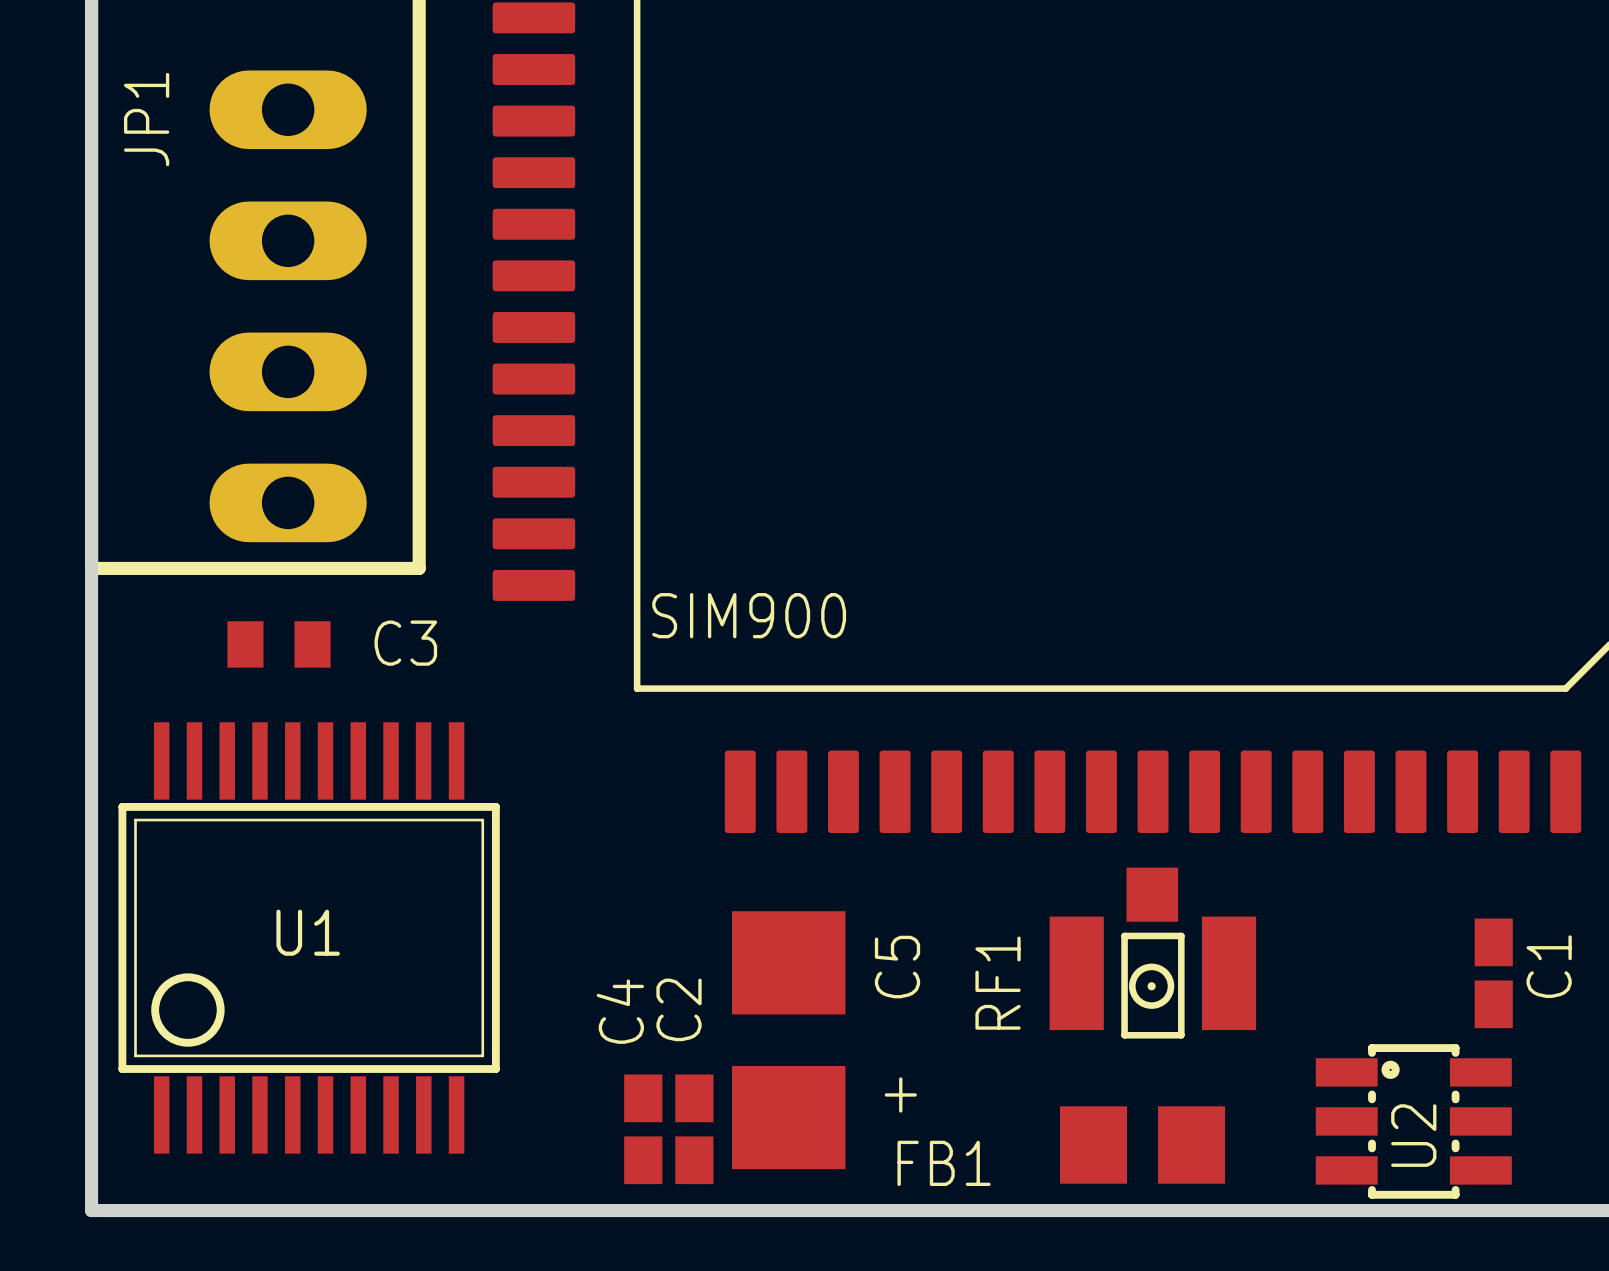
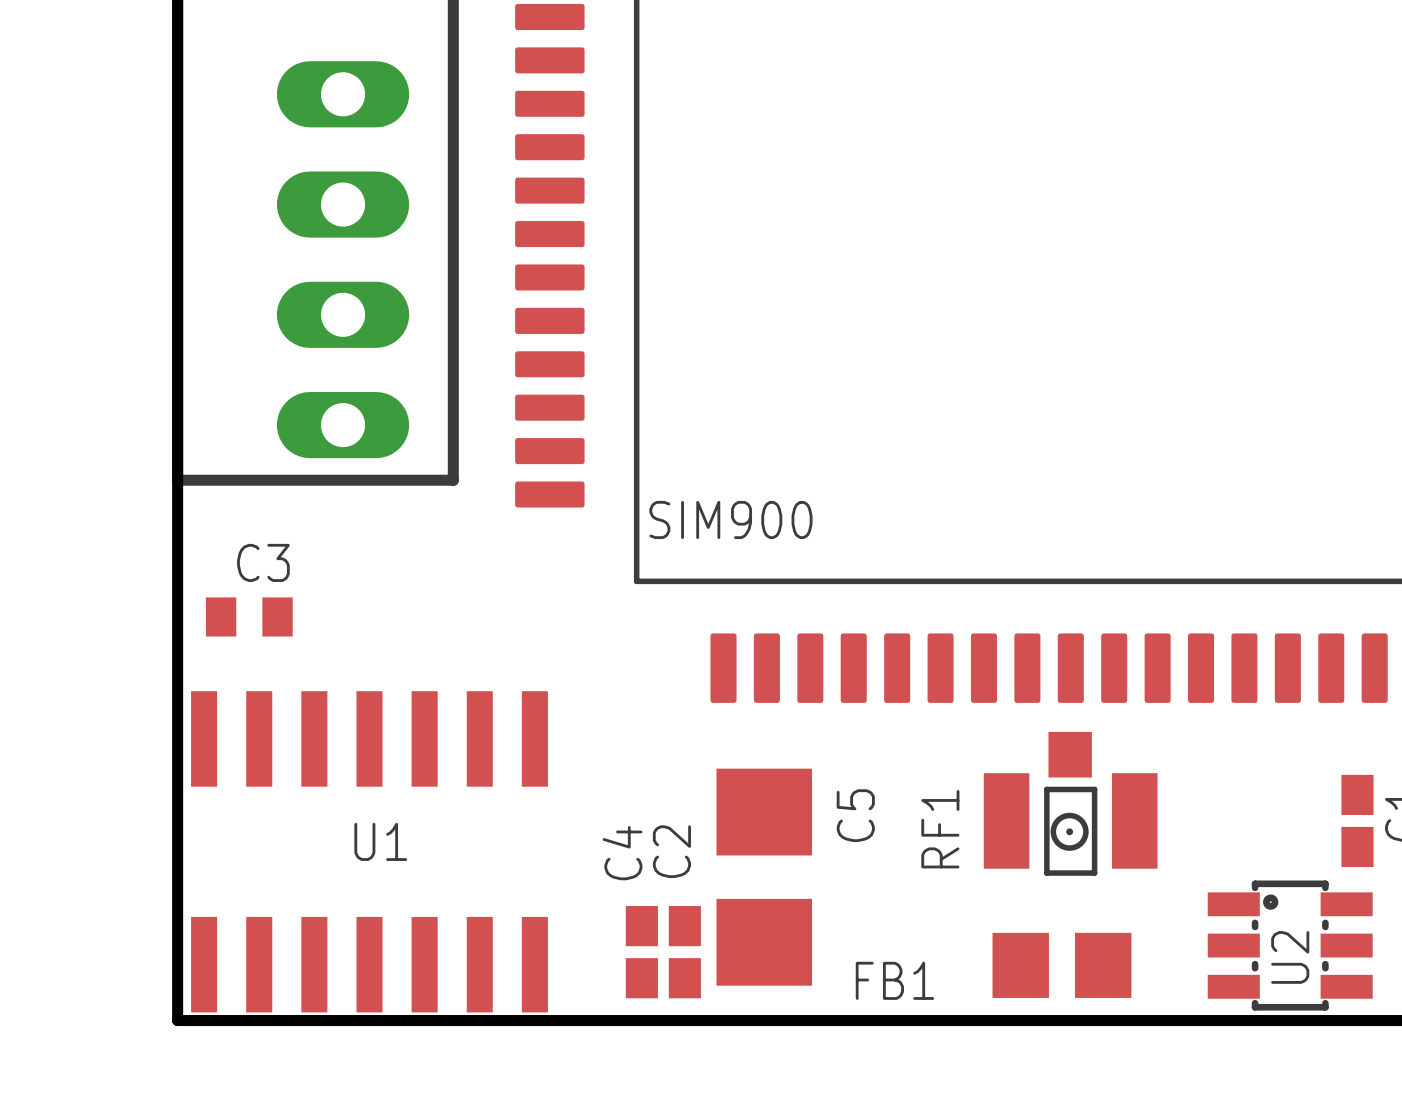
JP1 name: JP1 (146, 119) -> none
C3 name position: C3 (405, 643) -> C3 (263, 562)
C3 position: (278, 644) -> (249, 616)
U1 footprint: [118, 722, 500, 1154] -> [191, 691, 548, 1013]
text: + (900, 1094) -> none

